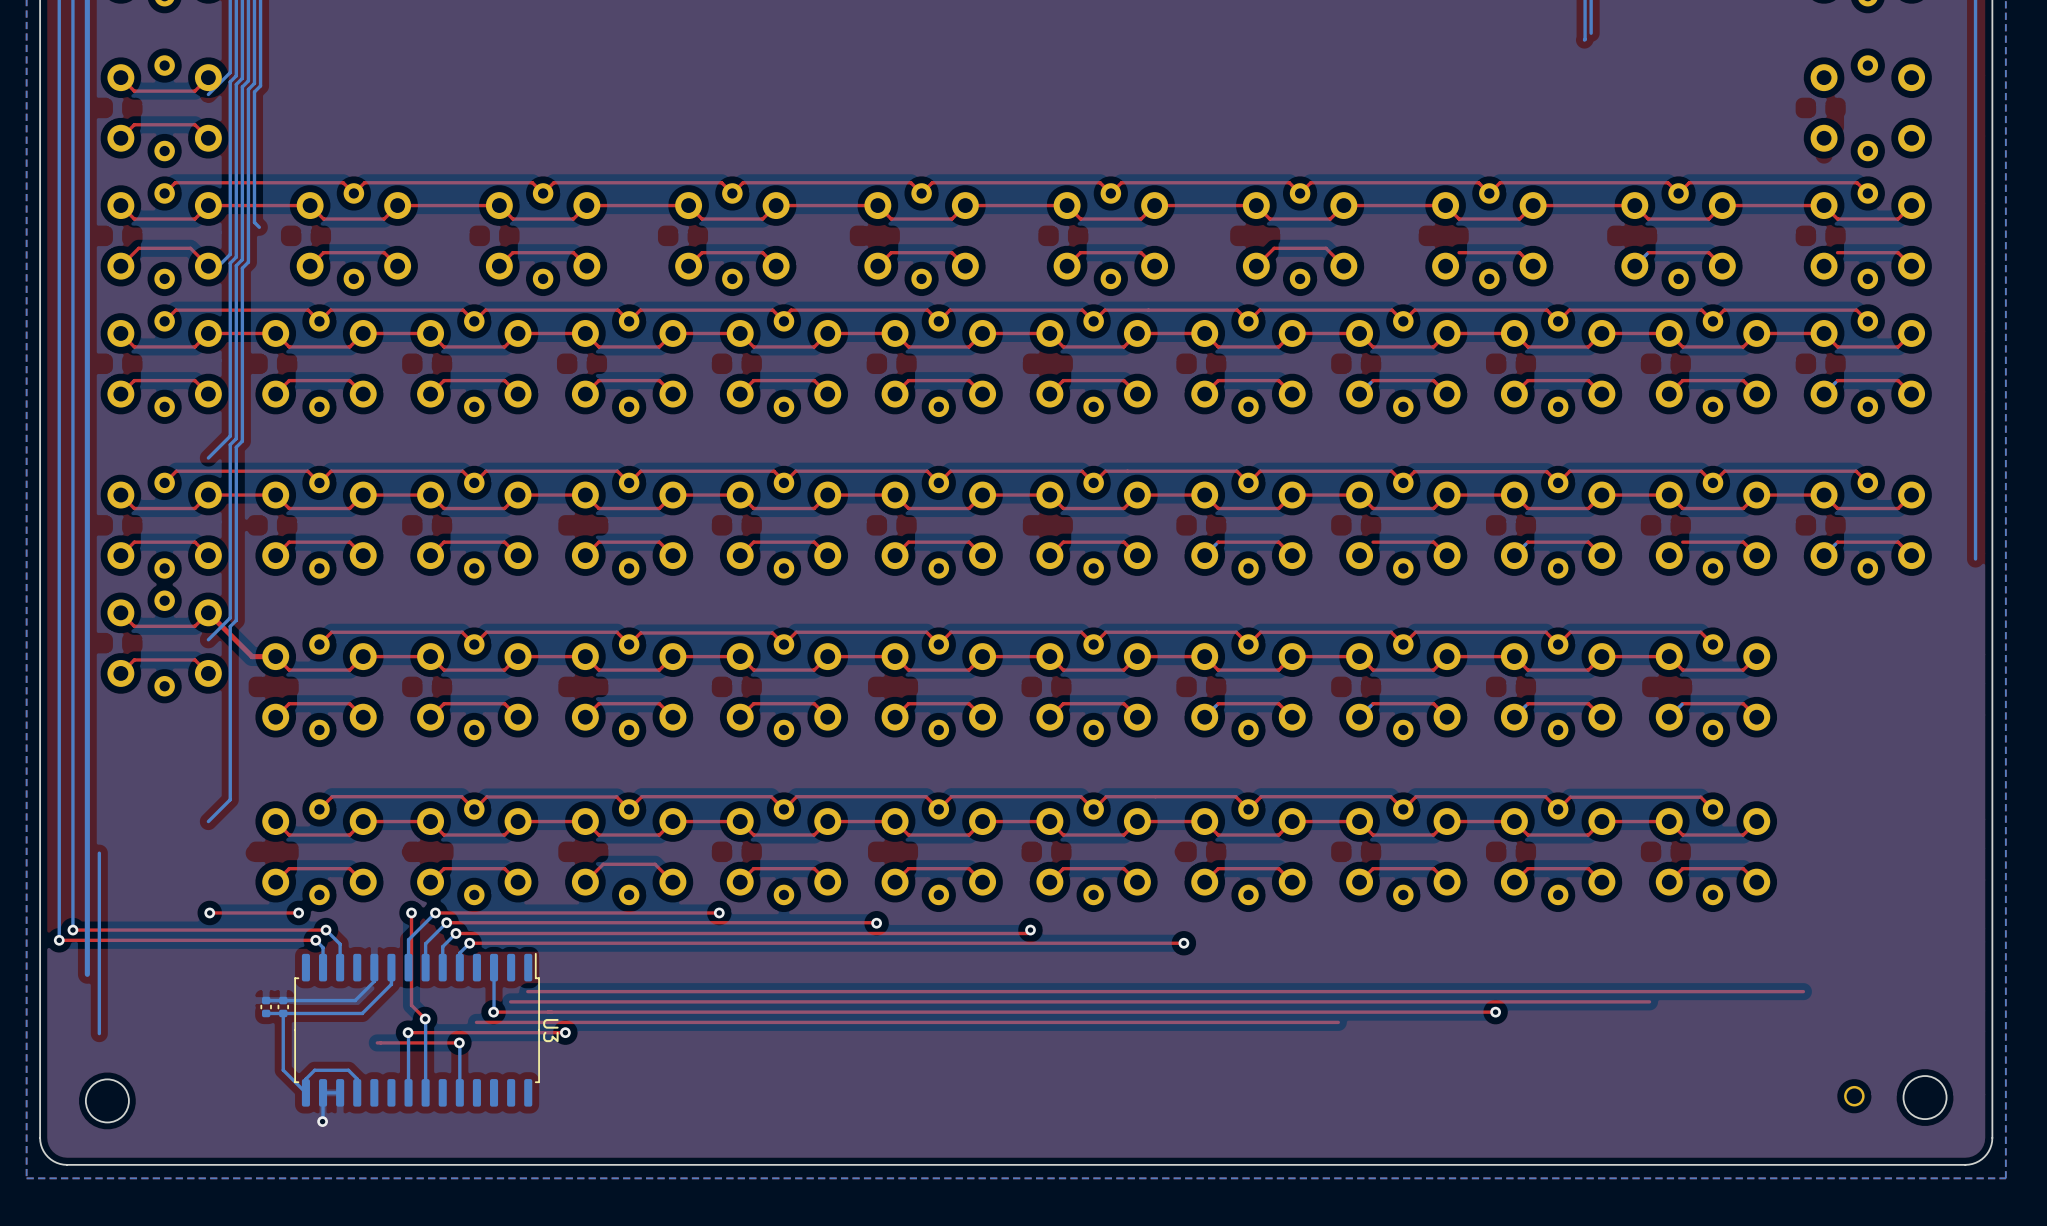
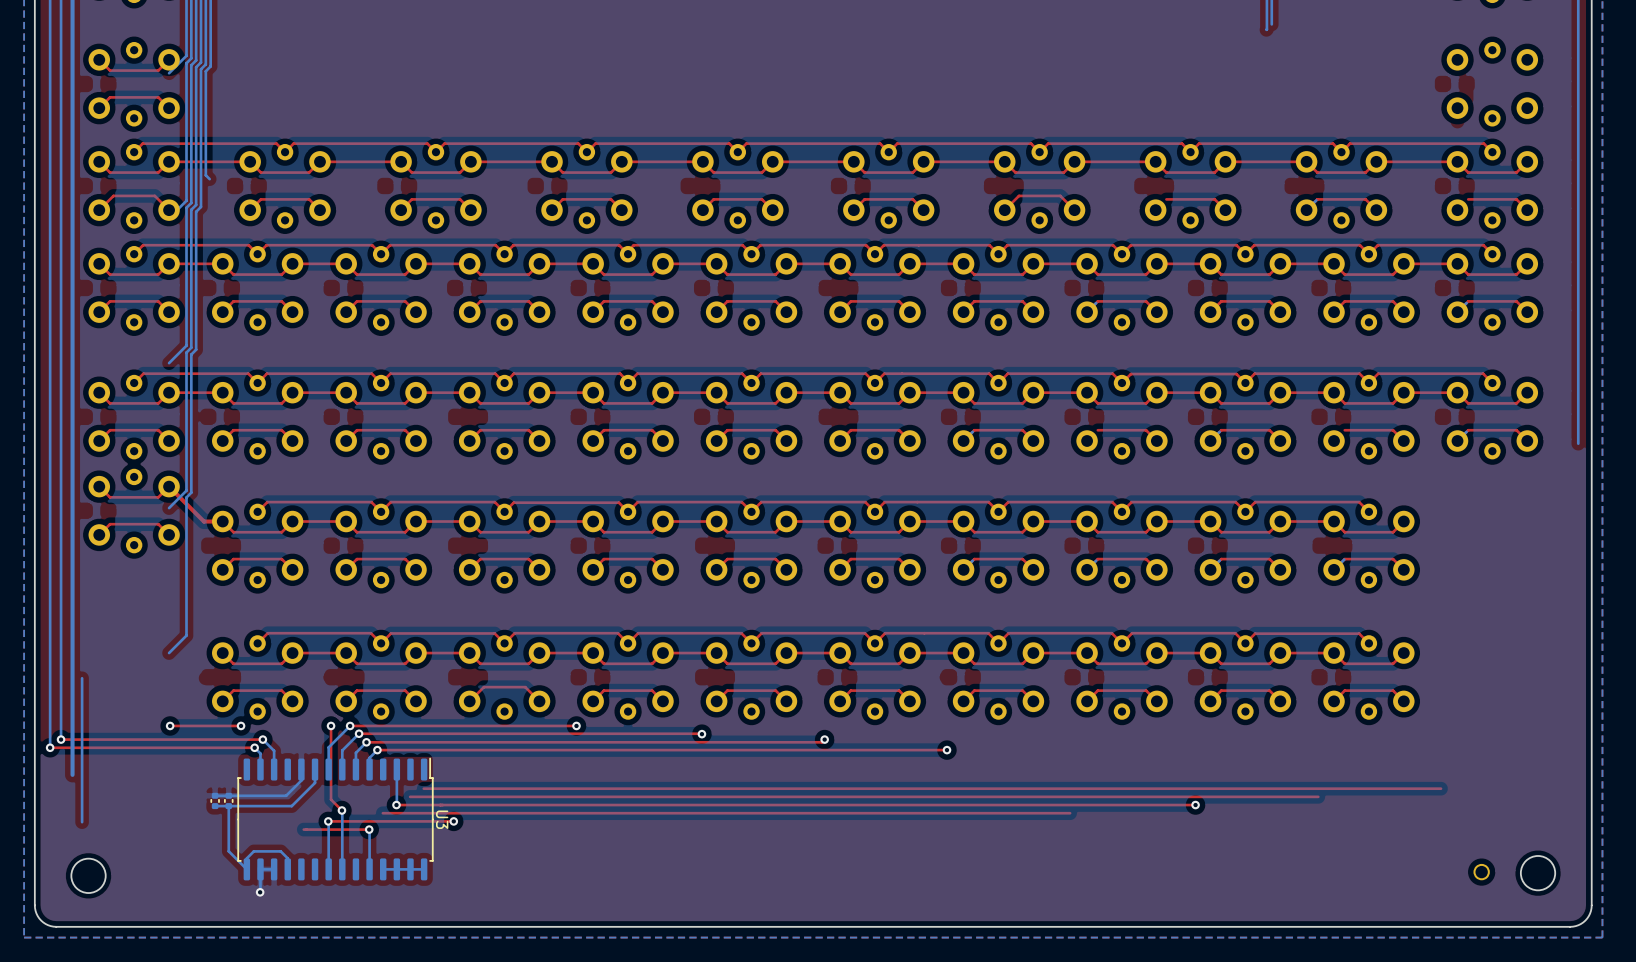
bottom track: none -> (424, 869) (383, 869)

